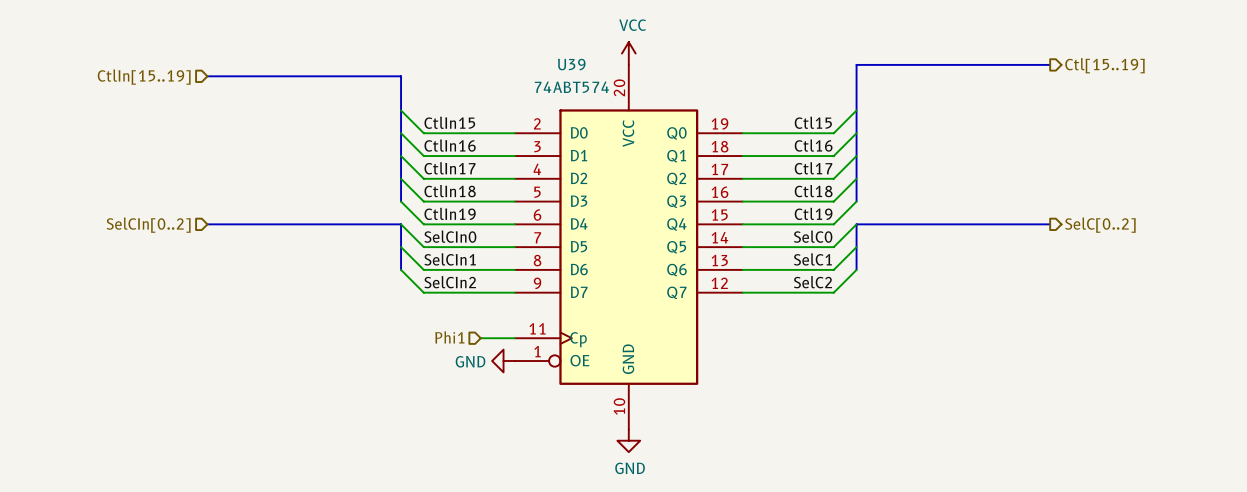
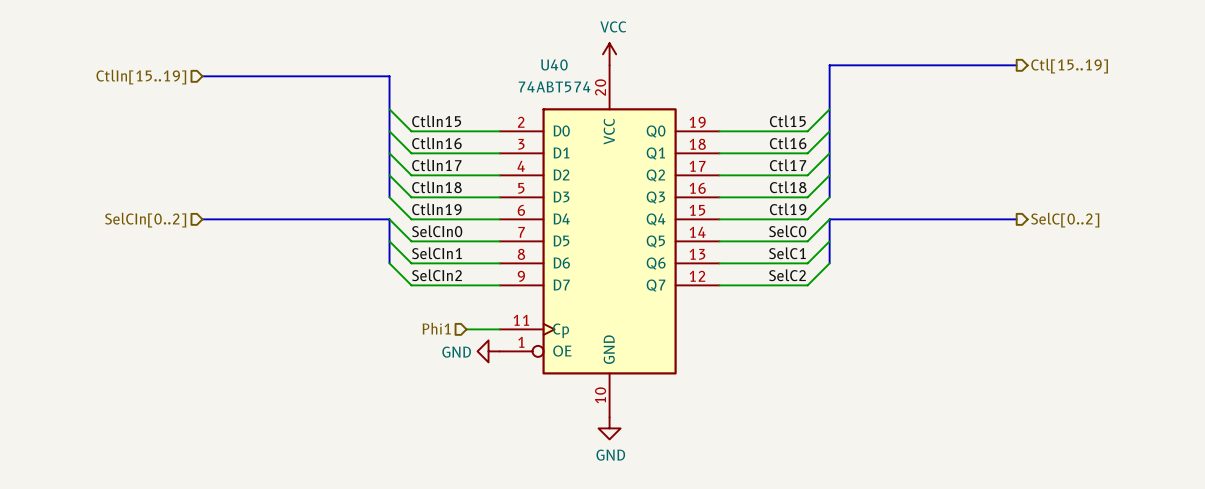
U39 name: U39 (571, 64) -> U40 (554, 64)

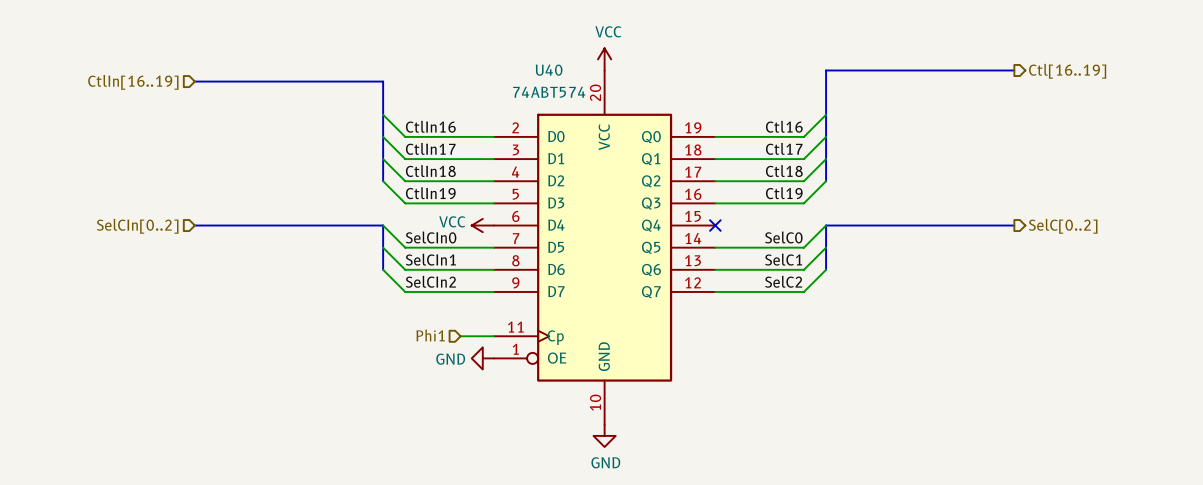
hierarchical label: Ctl[15..19] (1069, 66) -> Ctl[16..19] (1067, 71)
hierarchical label: CtlIn[15..19] (141, 77) -> CtlIn[16..19] (133, 82)
label: CtlIn15 (436, 121) -> CtlIn16 (430, 126)
label: Ctl15 (787, 121) -> Ctl16 (784, 126)
label: CtlIn16 (436, 143) -> CtlIn17 (430, 148)
label: Ctl16 (788, 143) -> Ctl17 (784, 148)
label: CtlIn17 (436, 165) -> CtlIn18 (430, 171)
label: Ctl17 (788, 165) -> Ctl18 (784, 171)
bus: (389, 175) (389, 197) -> none
bus: (829, 175) (829, 197) -> none
label: CtlIn18 (436, 187) -> CtlIn19 (430, 193)
label: Ctl18 (788, 187) -> Ctl19 (784, 193)
wire: (389, 197) (411, 219) (499, 219) -> none
wire: (829, 197) (807, 219) (719, 219) -> none
label: CtlIn19 (436, 209) -> none
label: Ctl19 (788, 209) -> none
power symbol: none -> VCC (482, 225)
no-connect mark: none -> (715, 225)

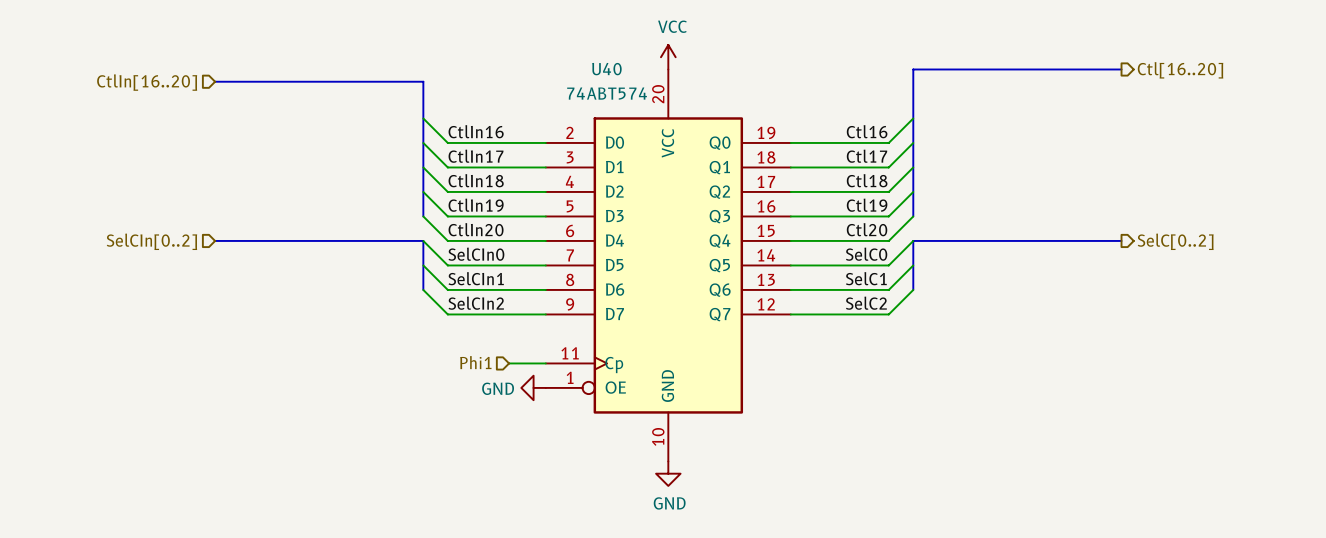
hierarchical label: Ctl[16..19] (1067, 71) -> Ctl[16..20] (1180, 70)
hierarchical label: CtlIn[16..19] (133, 82) -> CtlIn[16..20] (147, 82)
bus: none -> (423, 191) (423, 216)
bus: none -> (913, 191) (913, 216)
wire: none -> (423, 216) (447, 240) (545, 240)
wire: none -> (913, 216) (888, 240) (790, 240)
label: none -> CtlIn20 (476, 229)
label: none -> Ctl20 (867, 229)
power symbol: VCC (482, 225) -> none
no-connect mark: (715, 225) -> none

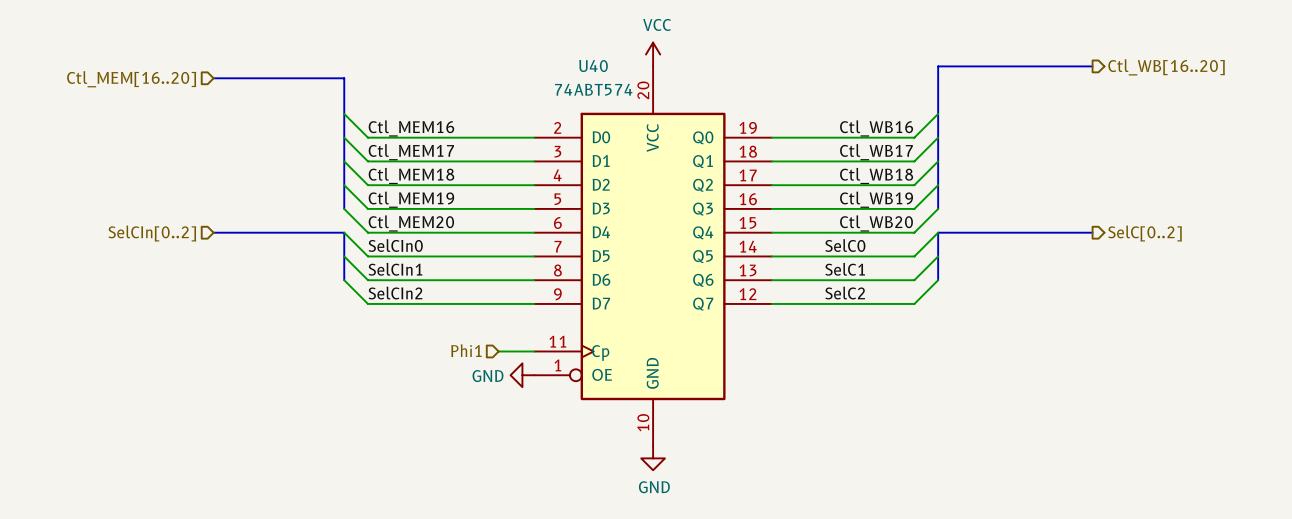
bus: (962, 69) (913, 69) (913, 216) -> (938, 66) (938, 208)
hierarchical label: Ctl[16..20] (1180, 70) -> Ctl_WB[16..20] (1166, 67)
bus: (349, 81) (423, 81) (423, 216) -> (344, 78) (344, 208)
hierarchical label: CtlIn[16..20] (147, 82) -> Ctl_MEM[16..20] (131, 79)
wire: (423, 118) (447, 142) -> (344, 113) (368, 137) (439, 137)
wire: (913, 118) (888, 142) -> (938, 113) (914, 137) (866, 137)
label: CtlIn16 (476, 131) -> Ctl_MEM16 (411, 128)
label: Ctl16 (867, 131) -> none
label: none -> Ctl_WB16 (876, 128)
wire: (423, 142) (447, 167) -> (344, 137) (368, 161) (439, 161)
wire: (913, 142) (888, 167) -> (938, 137) (914, 161) (866, 161)
label: CtlIn17 (476, 156) -> Ctl_MEM17 (411, 152)
label: Ctl17 (866, 156) -> none
label: none -> Ctl_WB17 (876, 152)
wire: (423, 167) (447, 191) -> (344, 161) (368, 185) (439, 185)
wire: (913, 167) (888, 191) -> (938, 161) (914, 185) (866, 185)
label: CtlIn18 (476, 180) -> Ctl_MEM18 (411, 175)
label: Ctl18 (867, 180) -> none
label: none -> Ctl_WB18 (876, 175)
wire: (423, 191) (447, 216) -> (344, 185) (368, 208) (439, 208)
wire: (913, 191) (888, 216) -> (938, 185) (914, 208) (866, 208)
label: CtlIn19 (476, 205) -> Ctl_MEM19 (411, 199)
label: Ctl19 (867, 205) -> none
label: none -> Ctl_WB19 (876, 199)
wire: (423, 216) (447, 240) -> (344, 208) (368, 232) (439, 232)
wire: (913, 216) (888, 240) -> (938, 208) (914, 232) (866, 232)
label: CtlIn20 (476, 229) -> Ctl_MEM20 (411, 223)
label: Ctl20 (867, 229) -> Ctl_WB20 (876, 223)
bus: (349, 240) (423, 240) (423, 289) -> (344, 232) (344, 280)
wire: (423, 240) (447, 265) -> (344, 232) (368, 256) (439, 256)
wire: (913, 240) (888, 265) -> (938, 232) (914, 256) (866, 256)
bus: (962, 240) (913, 240) (913, 289) -> (938, 232) (938, 280)
label position: SelCIn0 (476, 254) -> SelCIn0 (395, 245)
wire: (423, 265) (447, 289) -> (344, 256) (368, 280) (439, 280)
wire: (913, 265) (888, 289) -> (938, 256) (914, 280) (866, 280)
label position: SelCIn1 (476, 278) -> SelCIn1 (395, 269)
wire: (423, 289) (447, 314) -> (344, 280) (368, 303) (439, 303)
wire: (913, 289) (888, 314) -> (938, 280) (914, 303) (866, 303)
label position: SelCIn2 (476, 303) -> SelCIn2 (395, 293)

